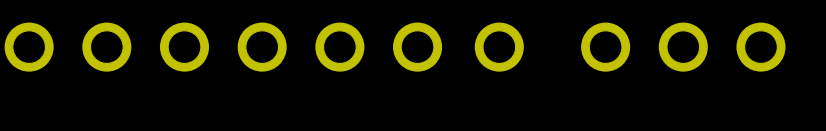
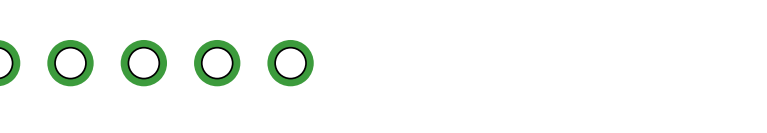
part: (417, 47) -> none
part: (499, 47) -> none
part: (605, 47) -> none
part: (683, 47) -> none
part: (760, 47) -> none

